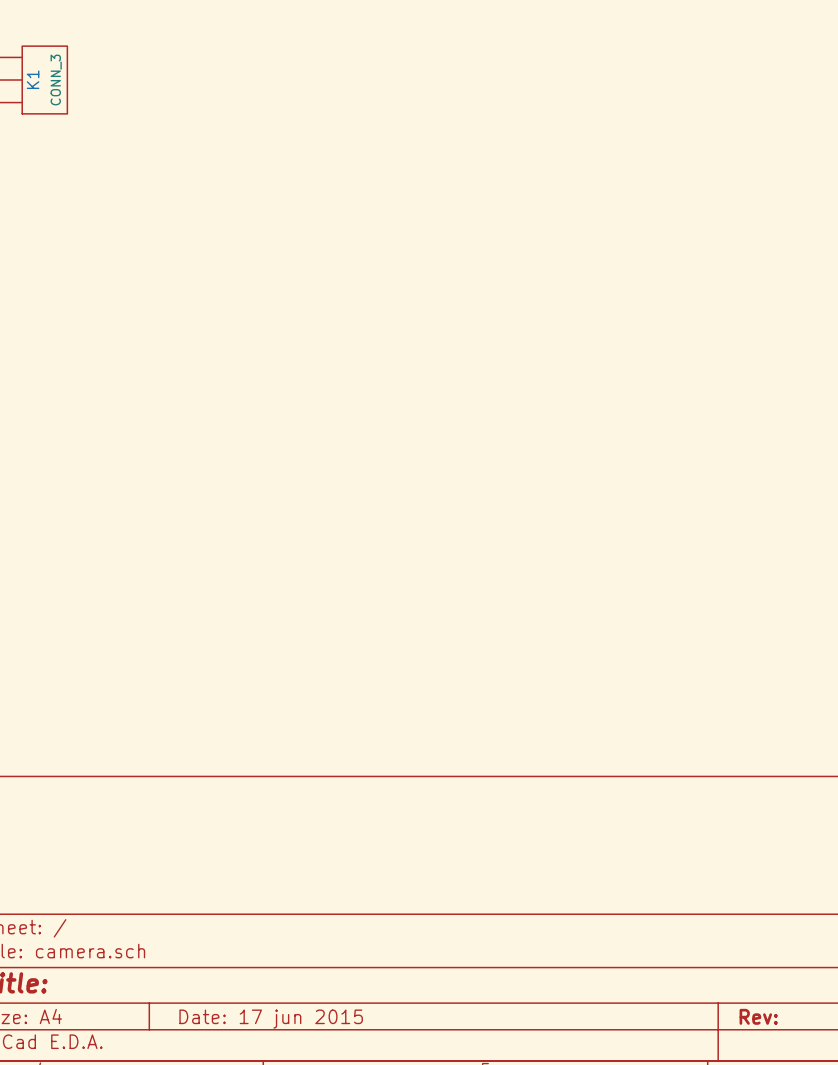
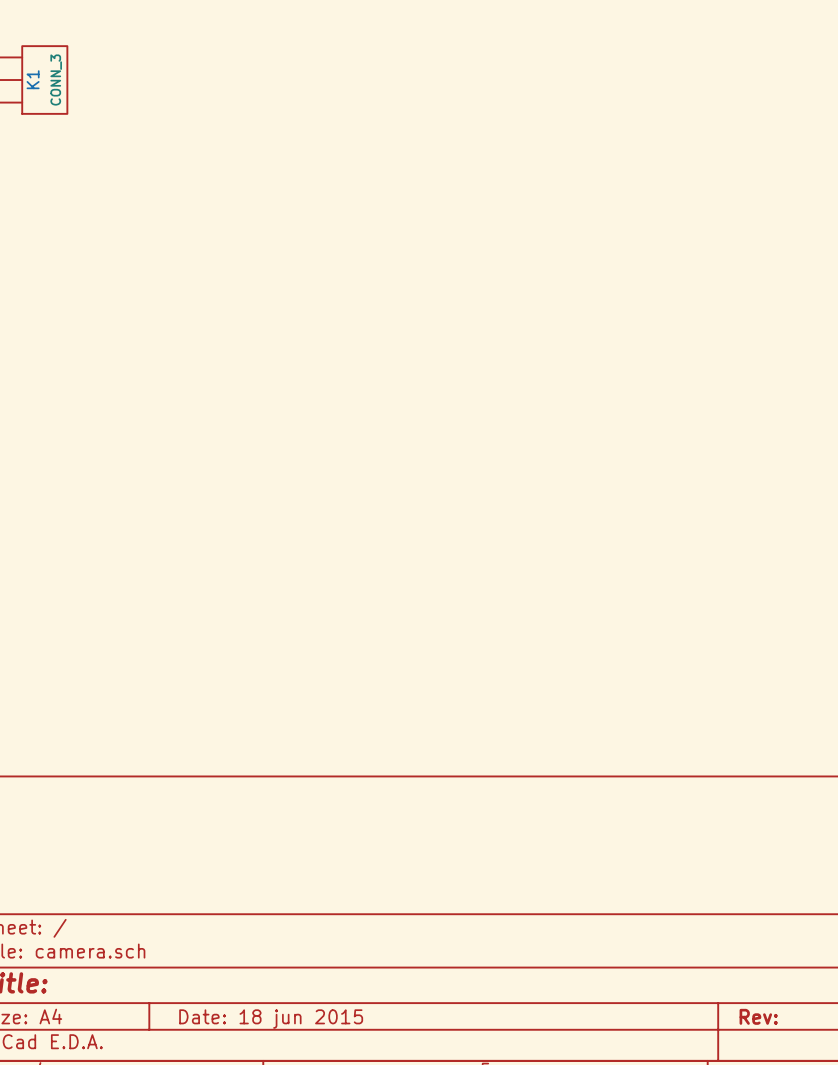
title block: Date: 17 jun 2015 (271, 1019) -> Date: 18 jun 2015 (271, 1019)

